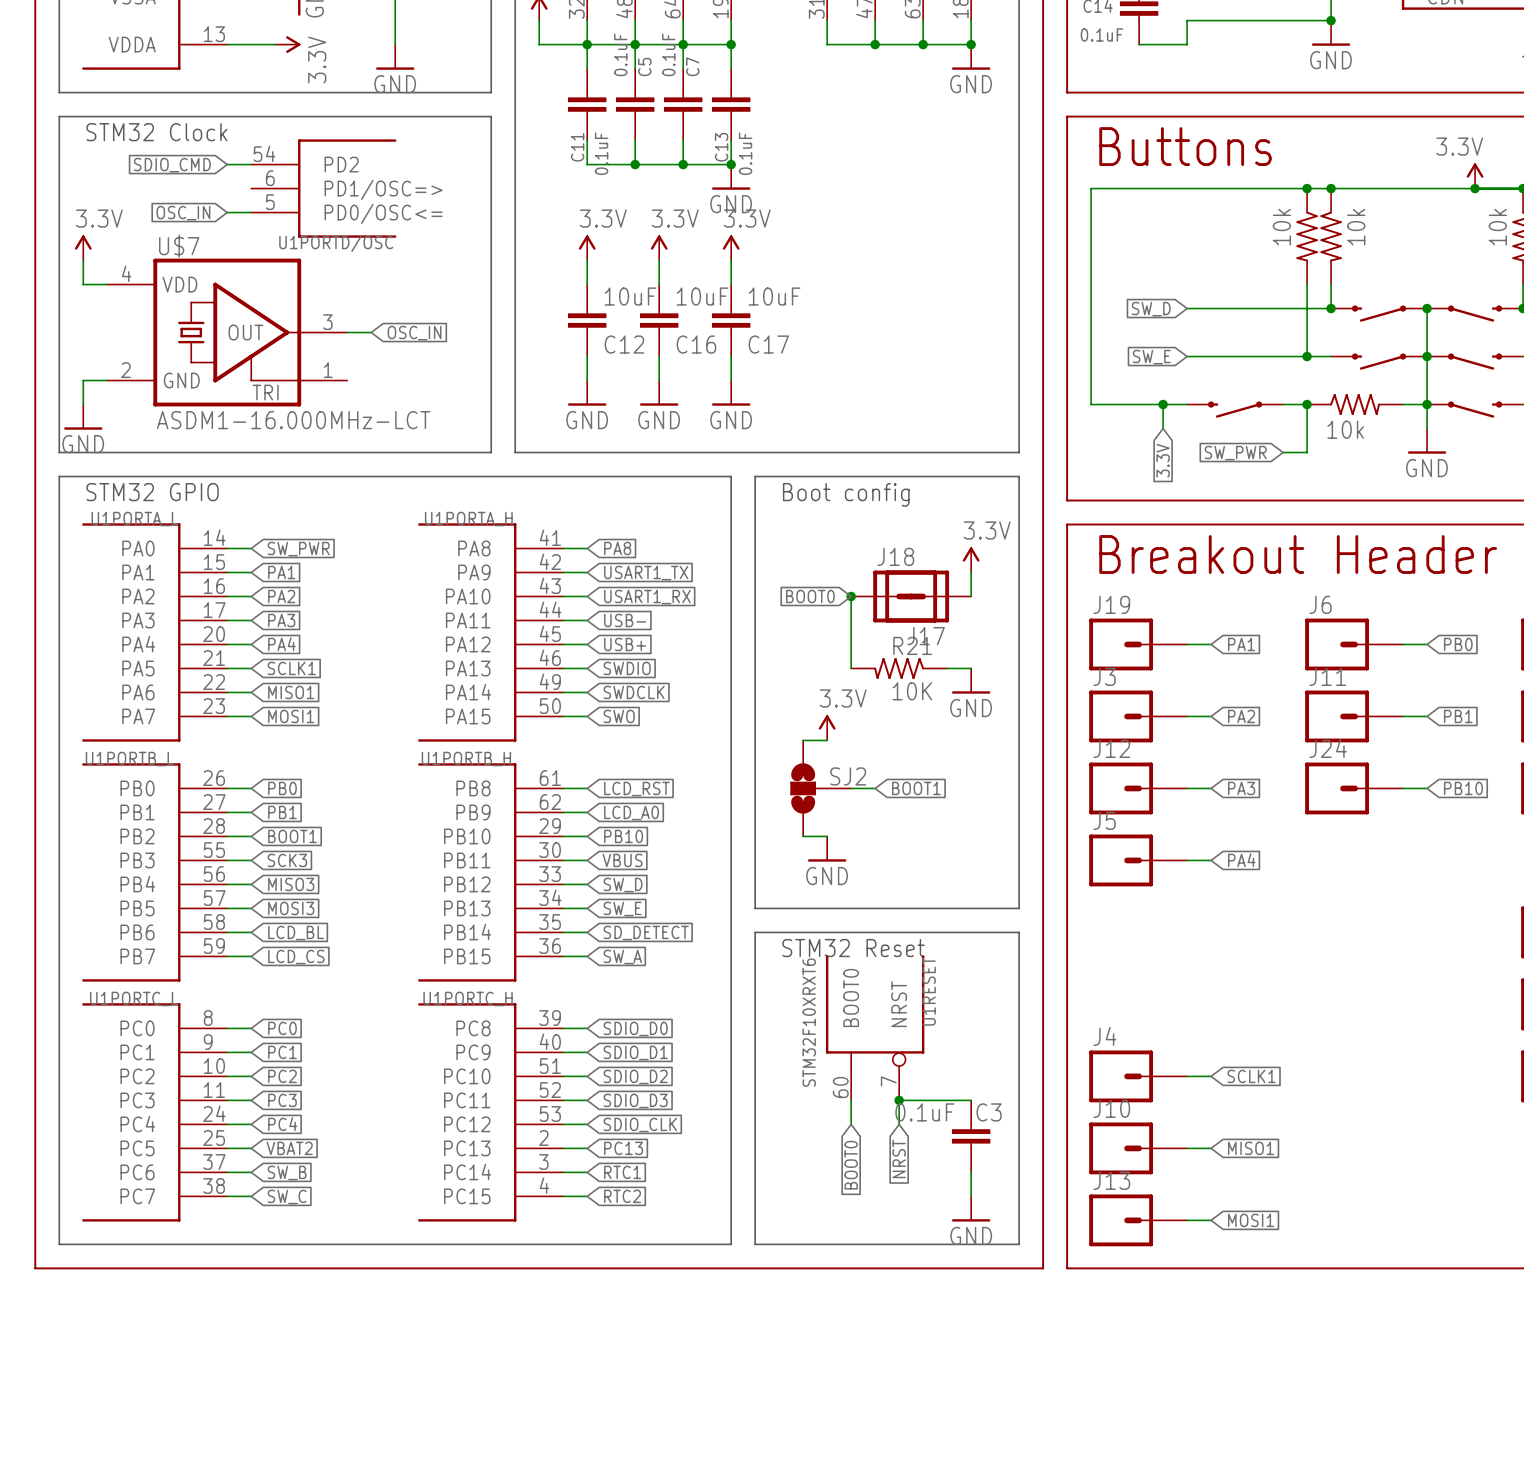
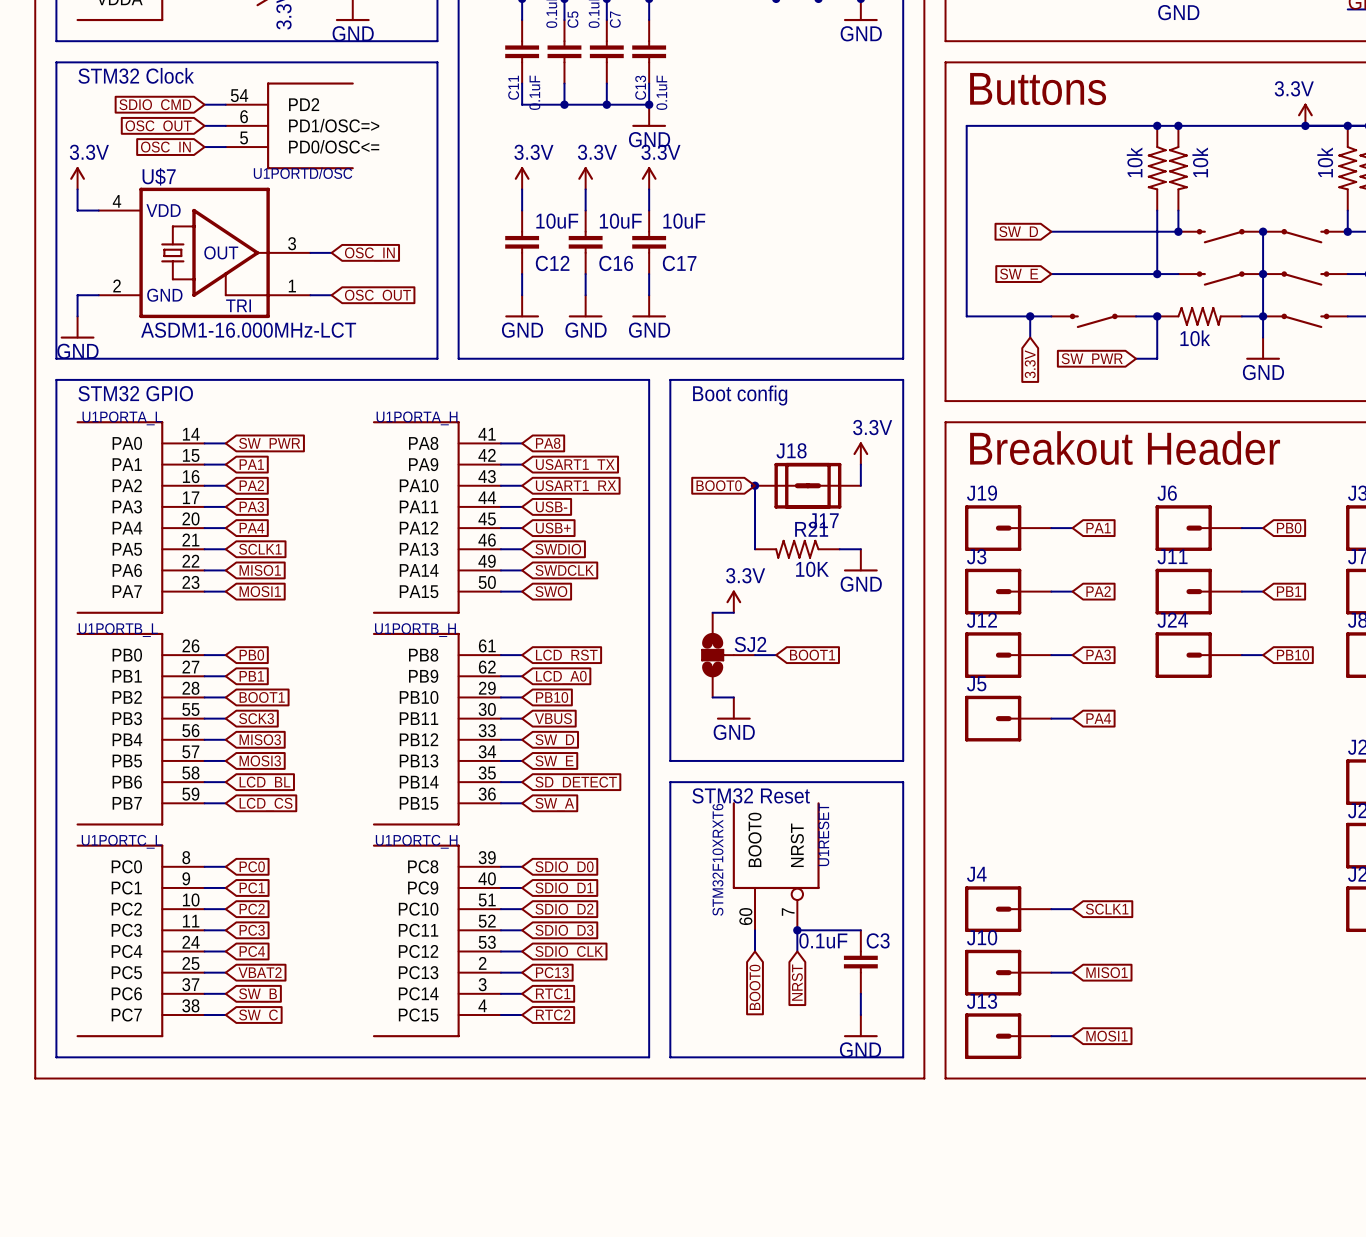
wire: none -> (204, 125) (225, 125)
global label: none -> OSC_OUT (158, 127)
wire: none -> (310, 295) (331, 295)
global label: none -> OSC_OUT (377, 296)

